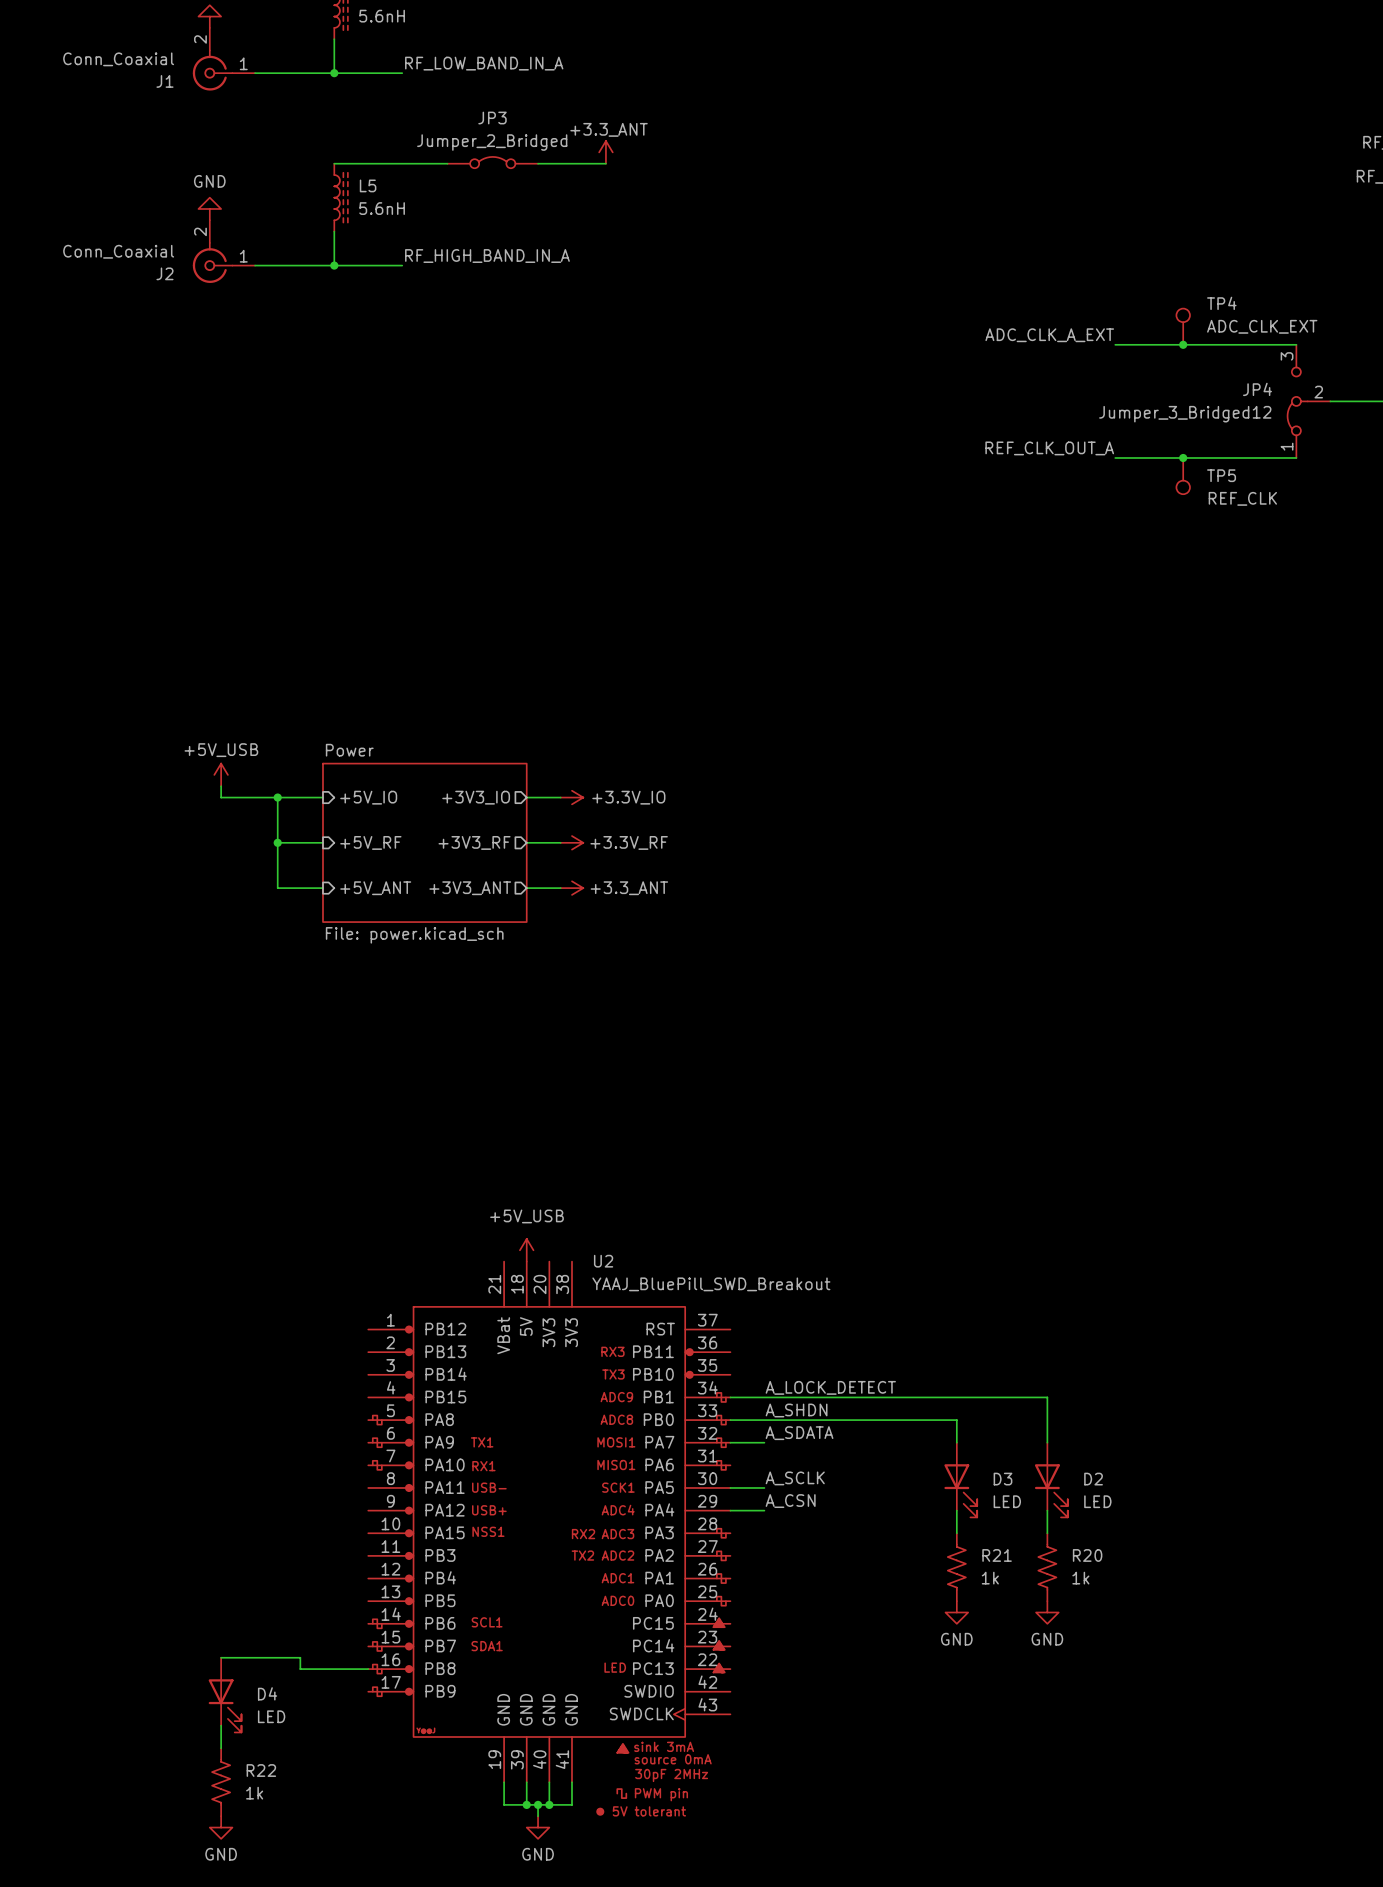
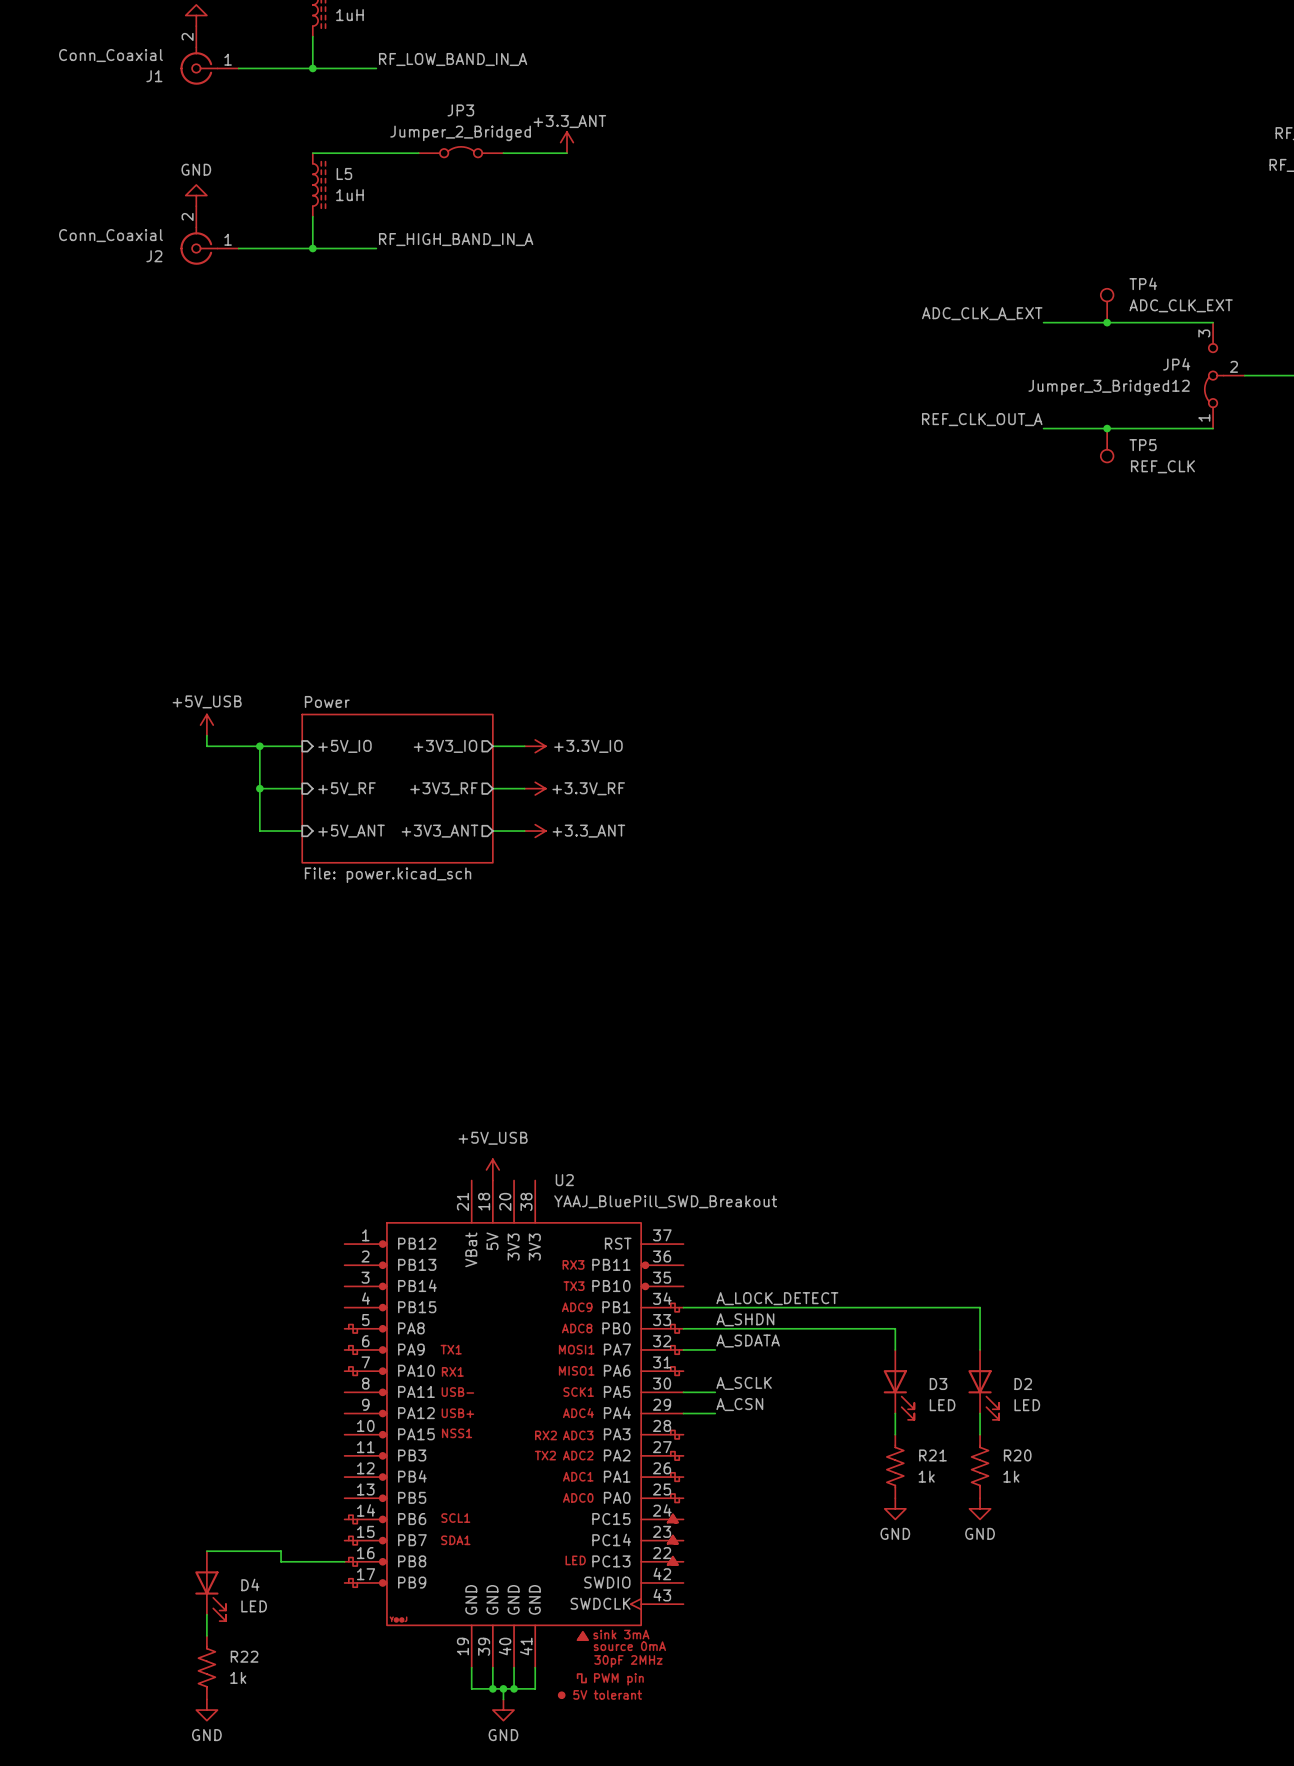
part value: 5.6nH (382, 16) -> 1uH (349, 15)
L5 value: 5.6nH (382, 208) -> 1uH (349, 195)

